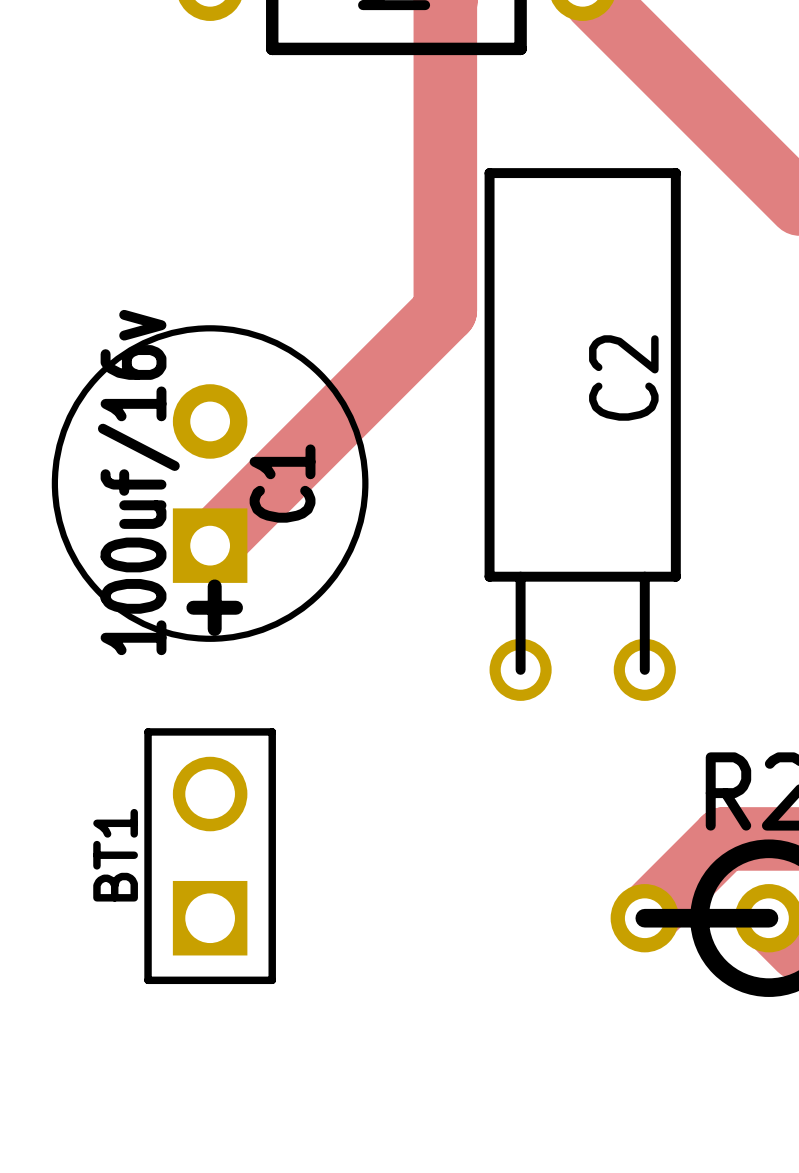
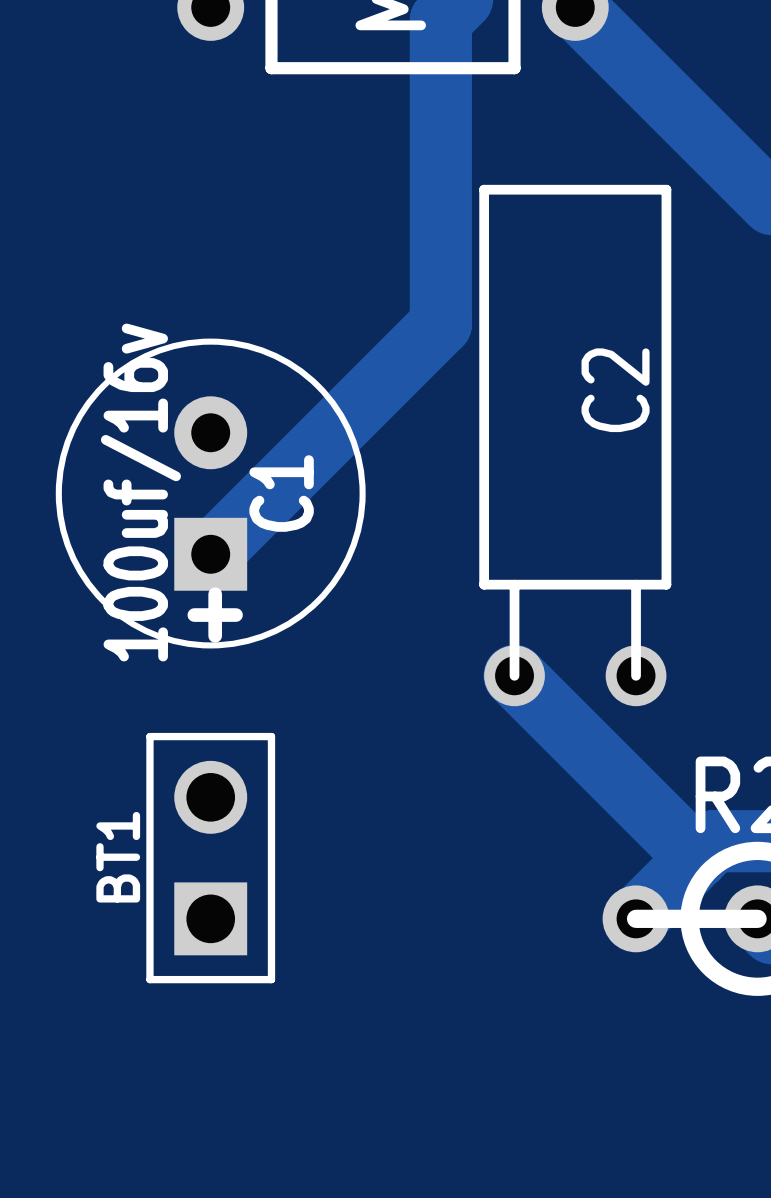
track: none -> (514, 675) (696, 858)

